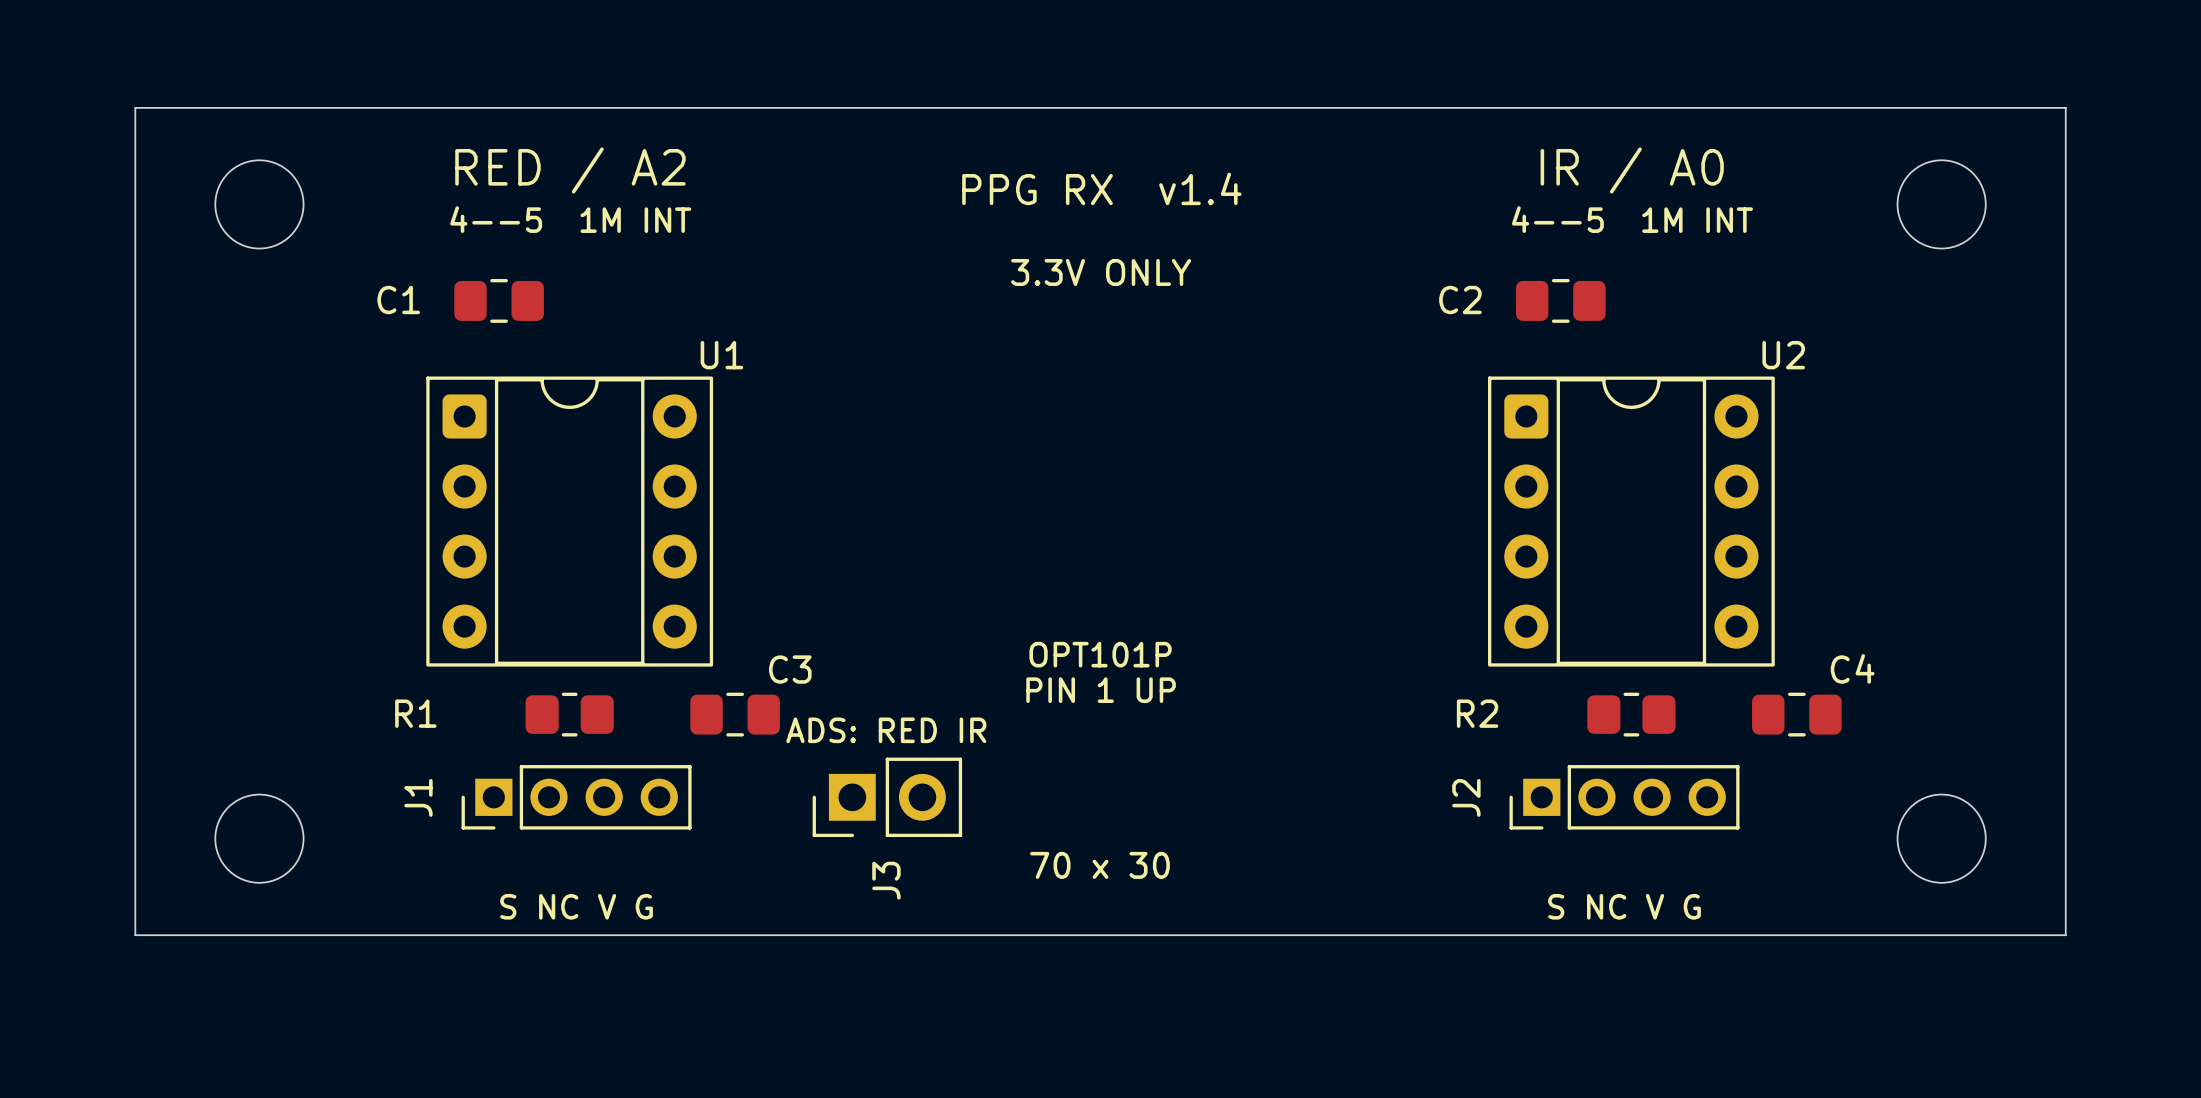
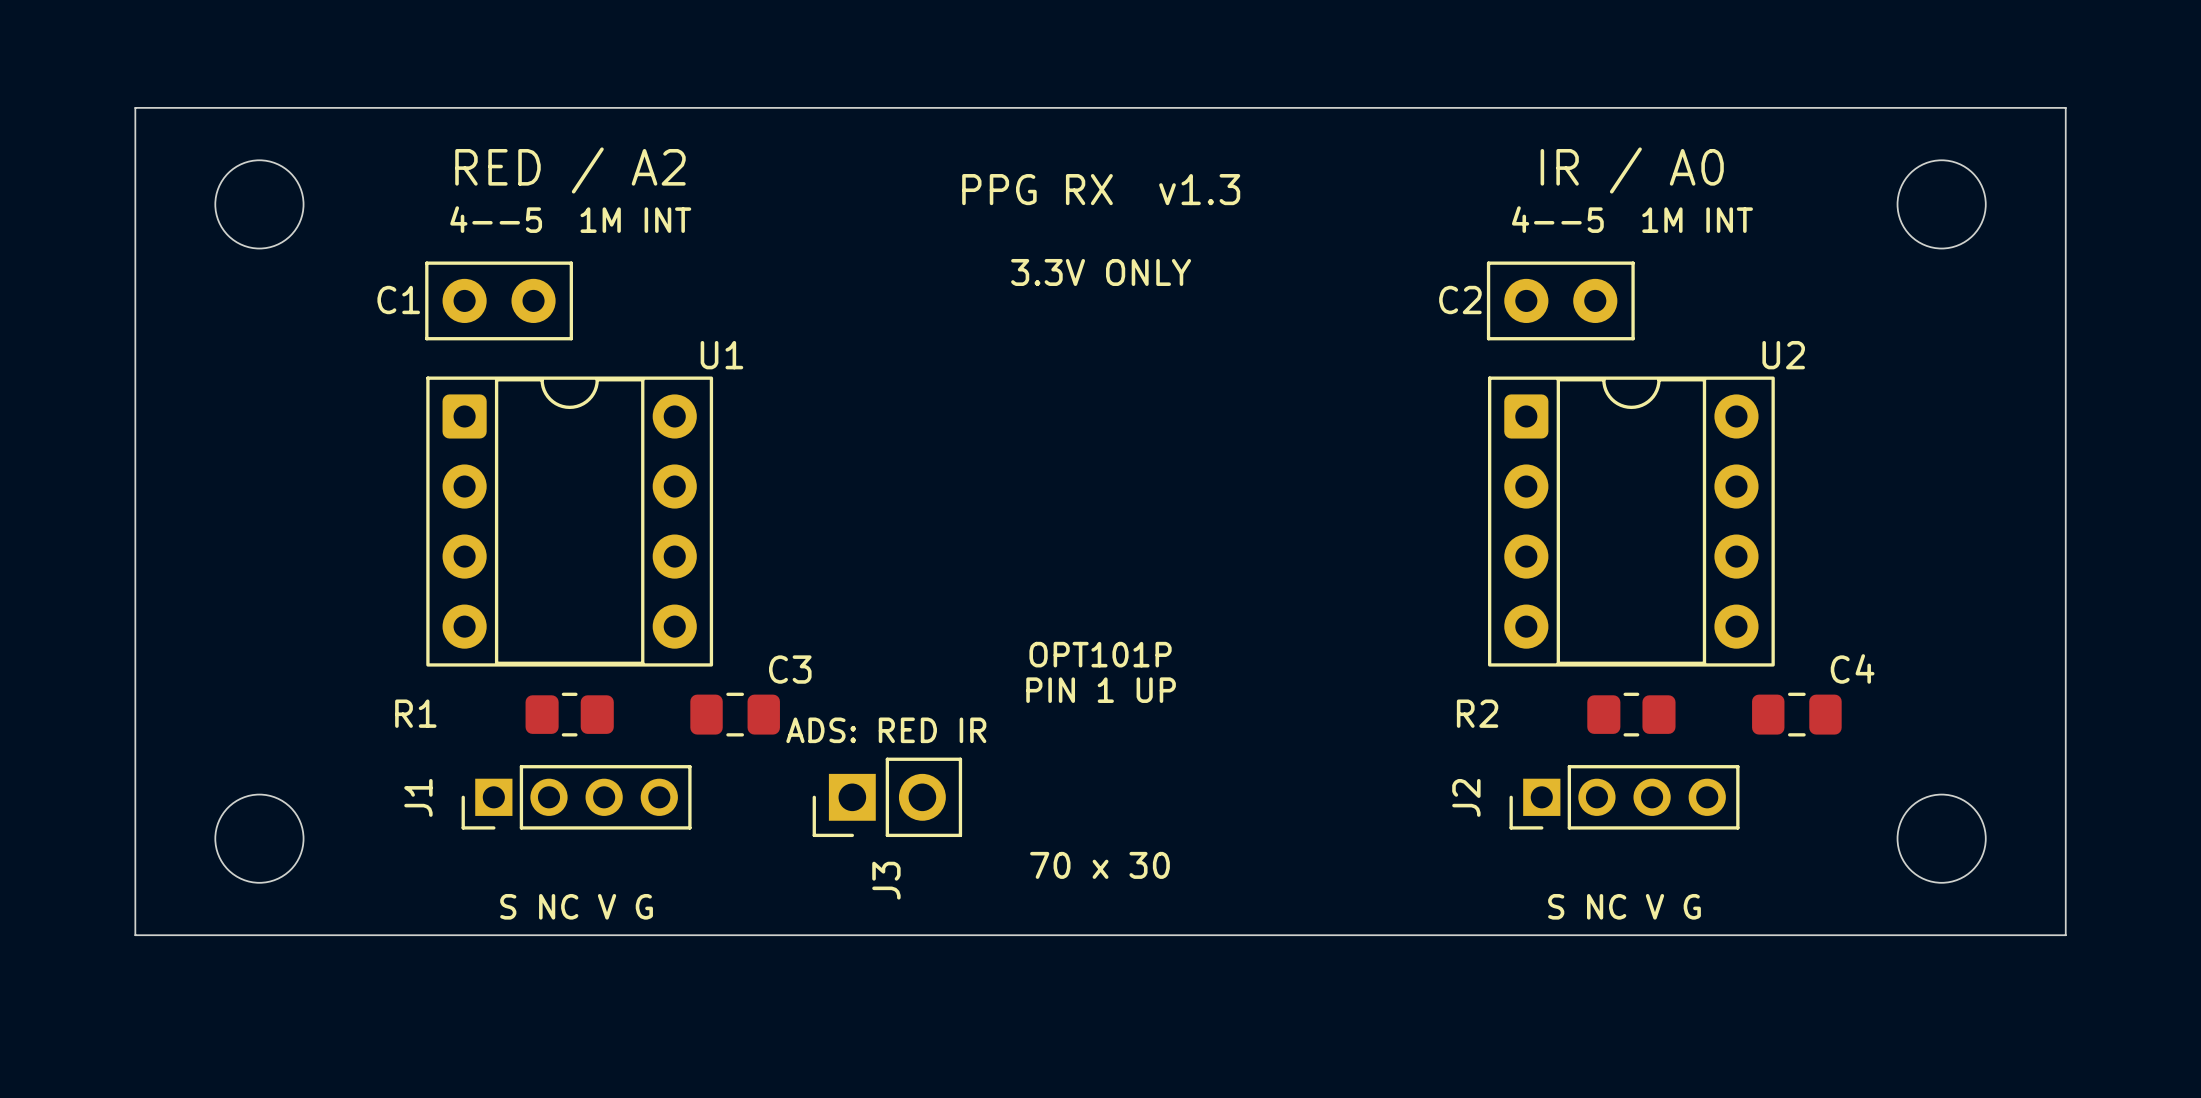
text: PPG RX v1.4 (1101, 188) -> PPG RX v1.3 (1101, 189)
C1 footprint: [454, 279, 544, 323] -> [425, 261, 573, 341]
C2 footprint: [1515, 279, 1606, 323] -> [1486, 261, 1635, 341]

